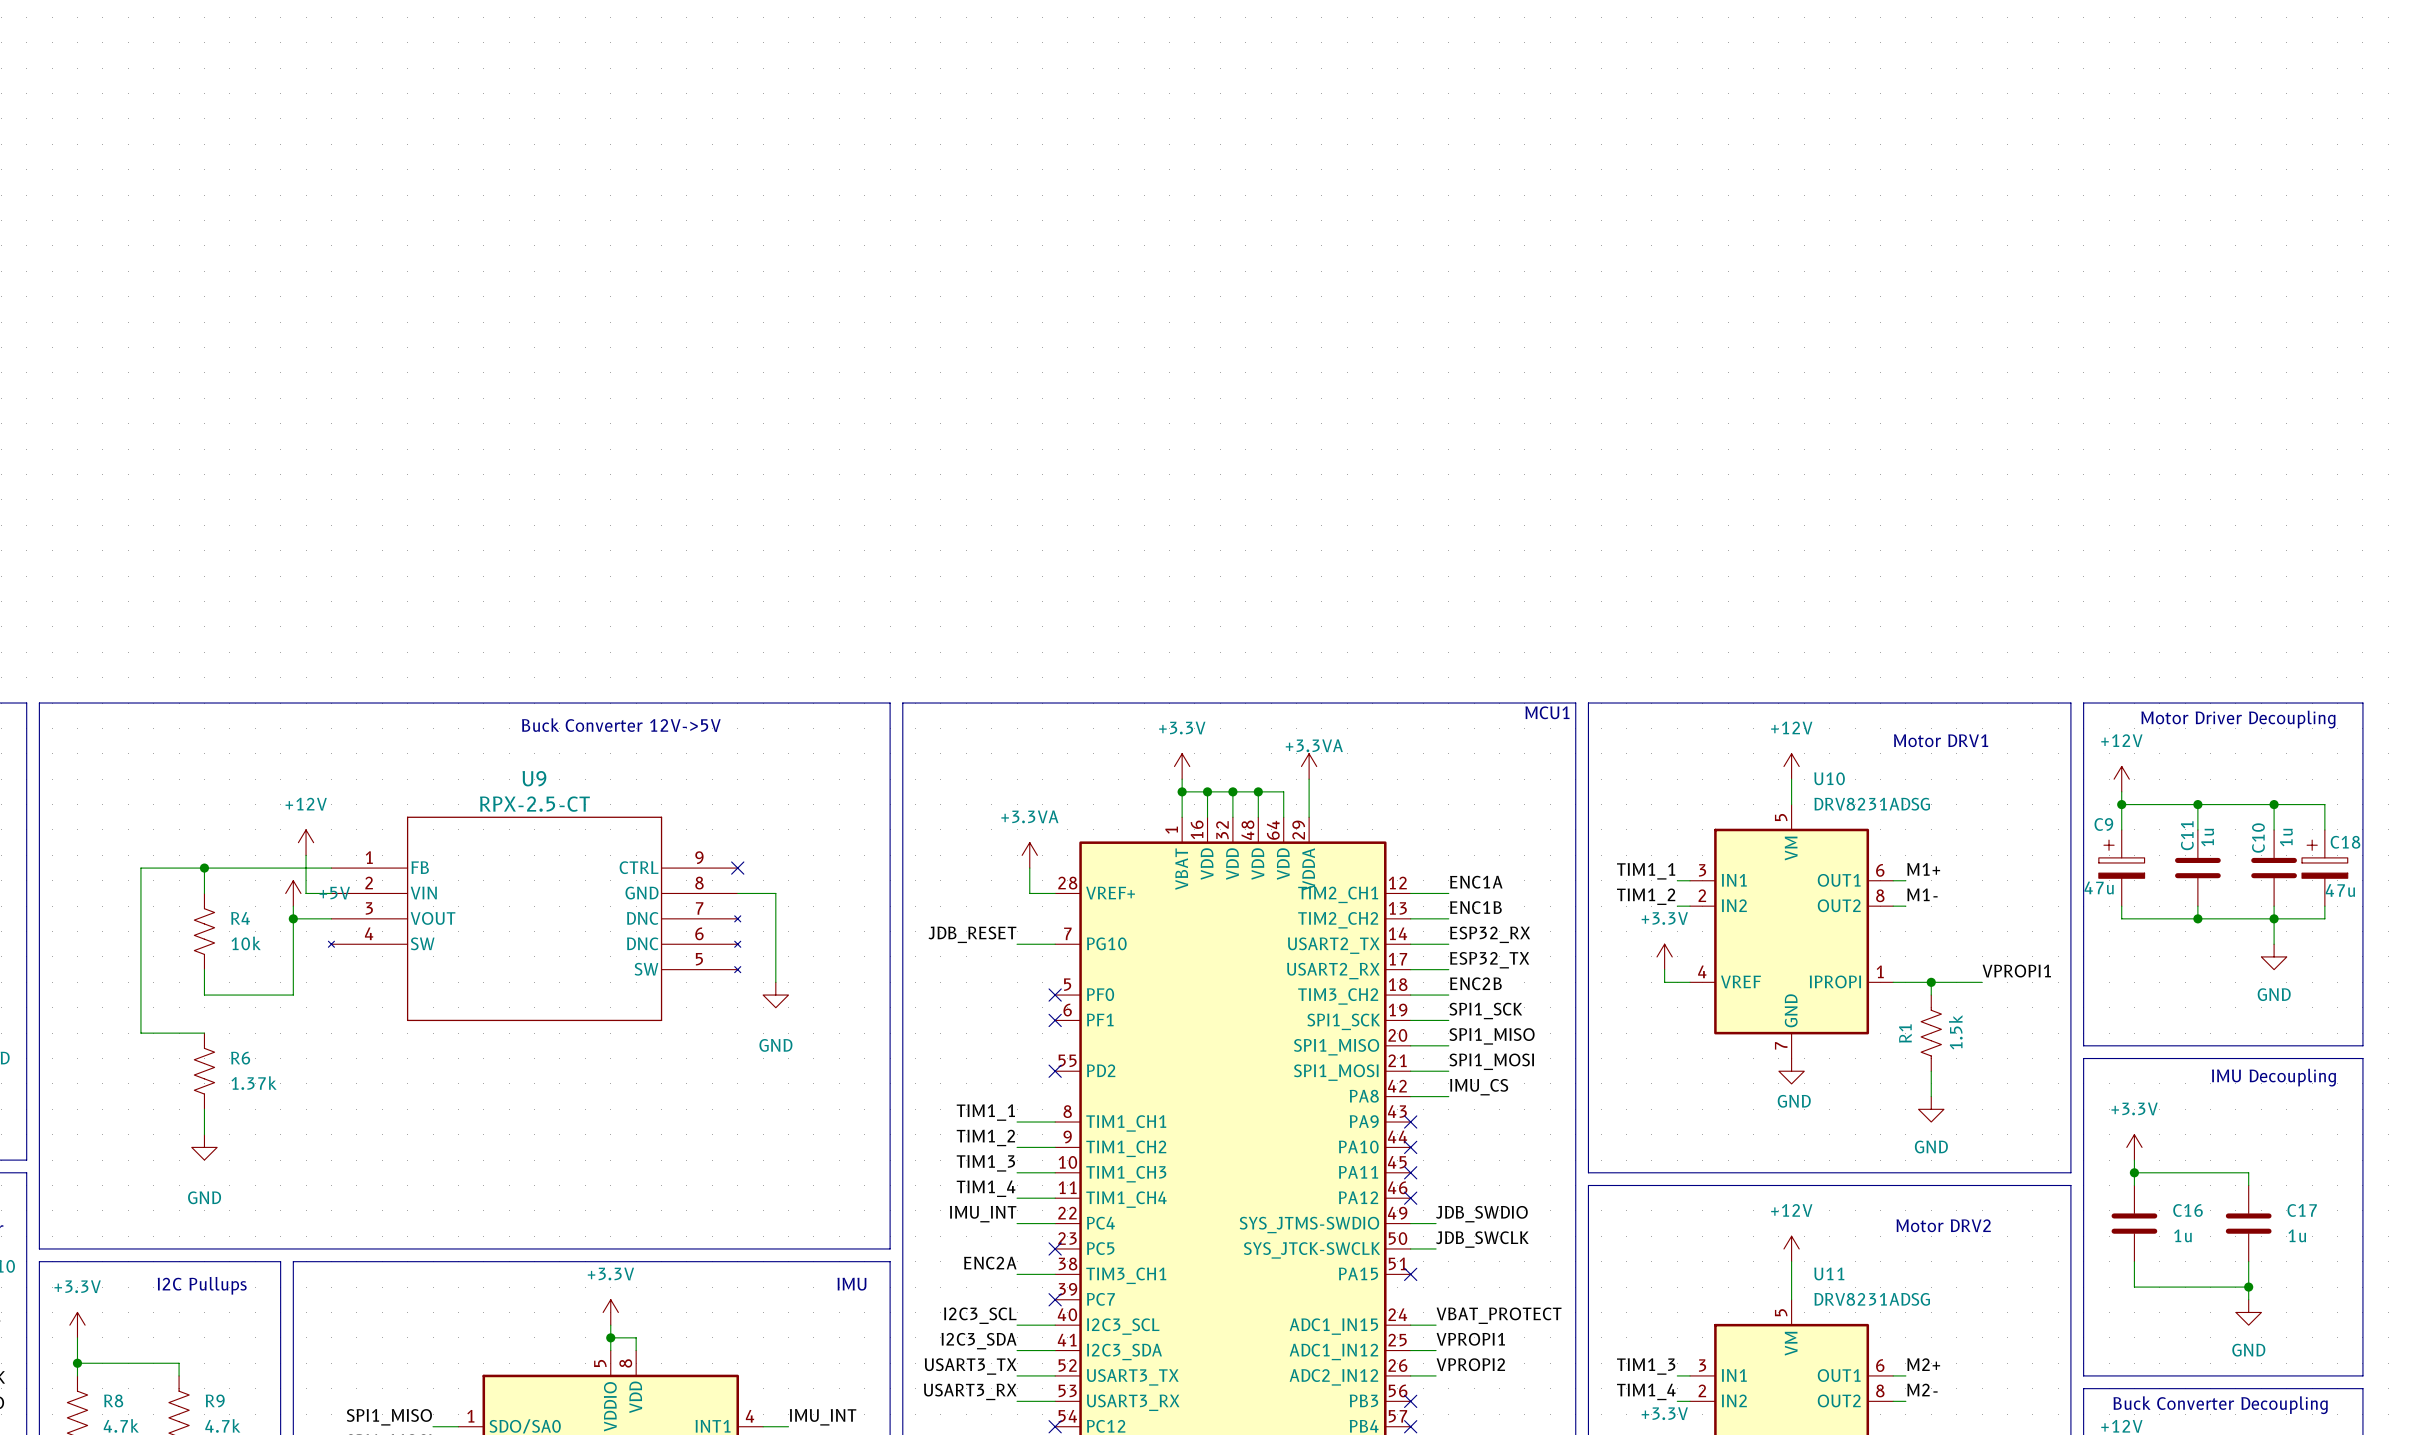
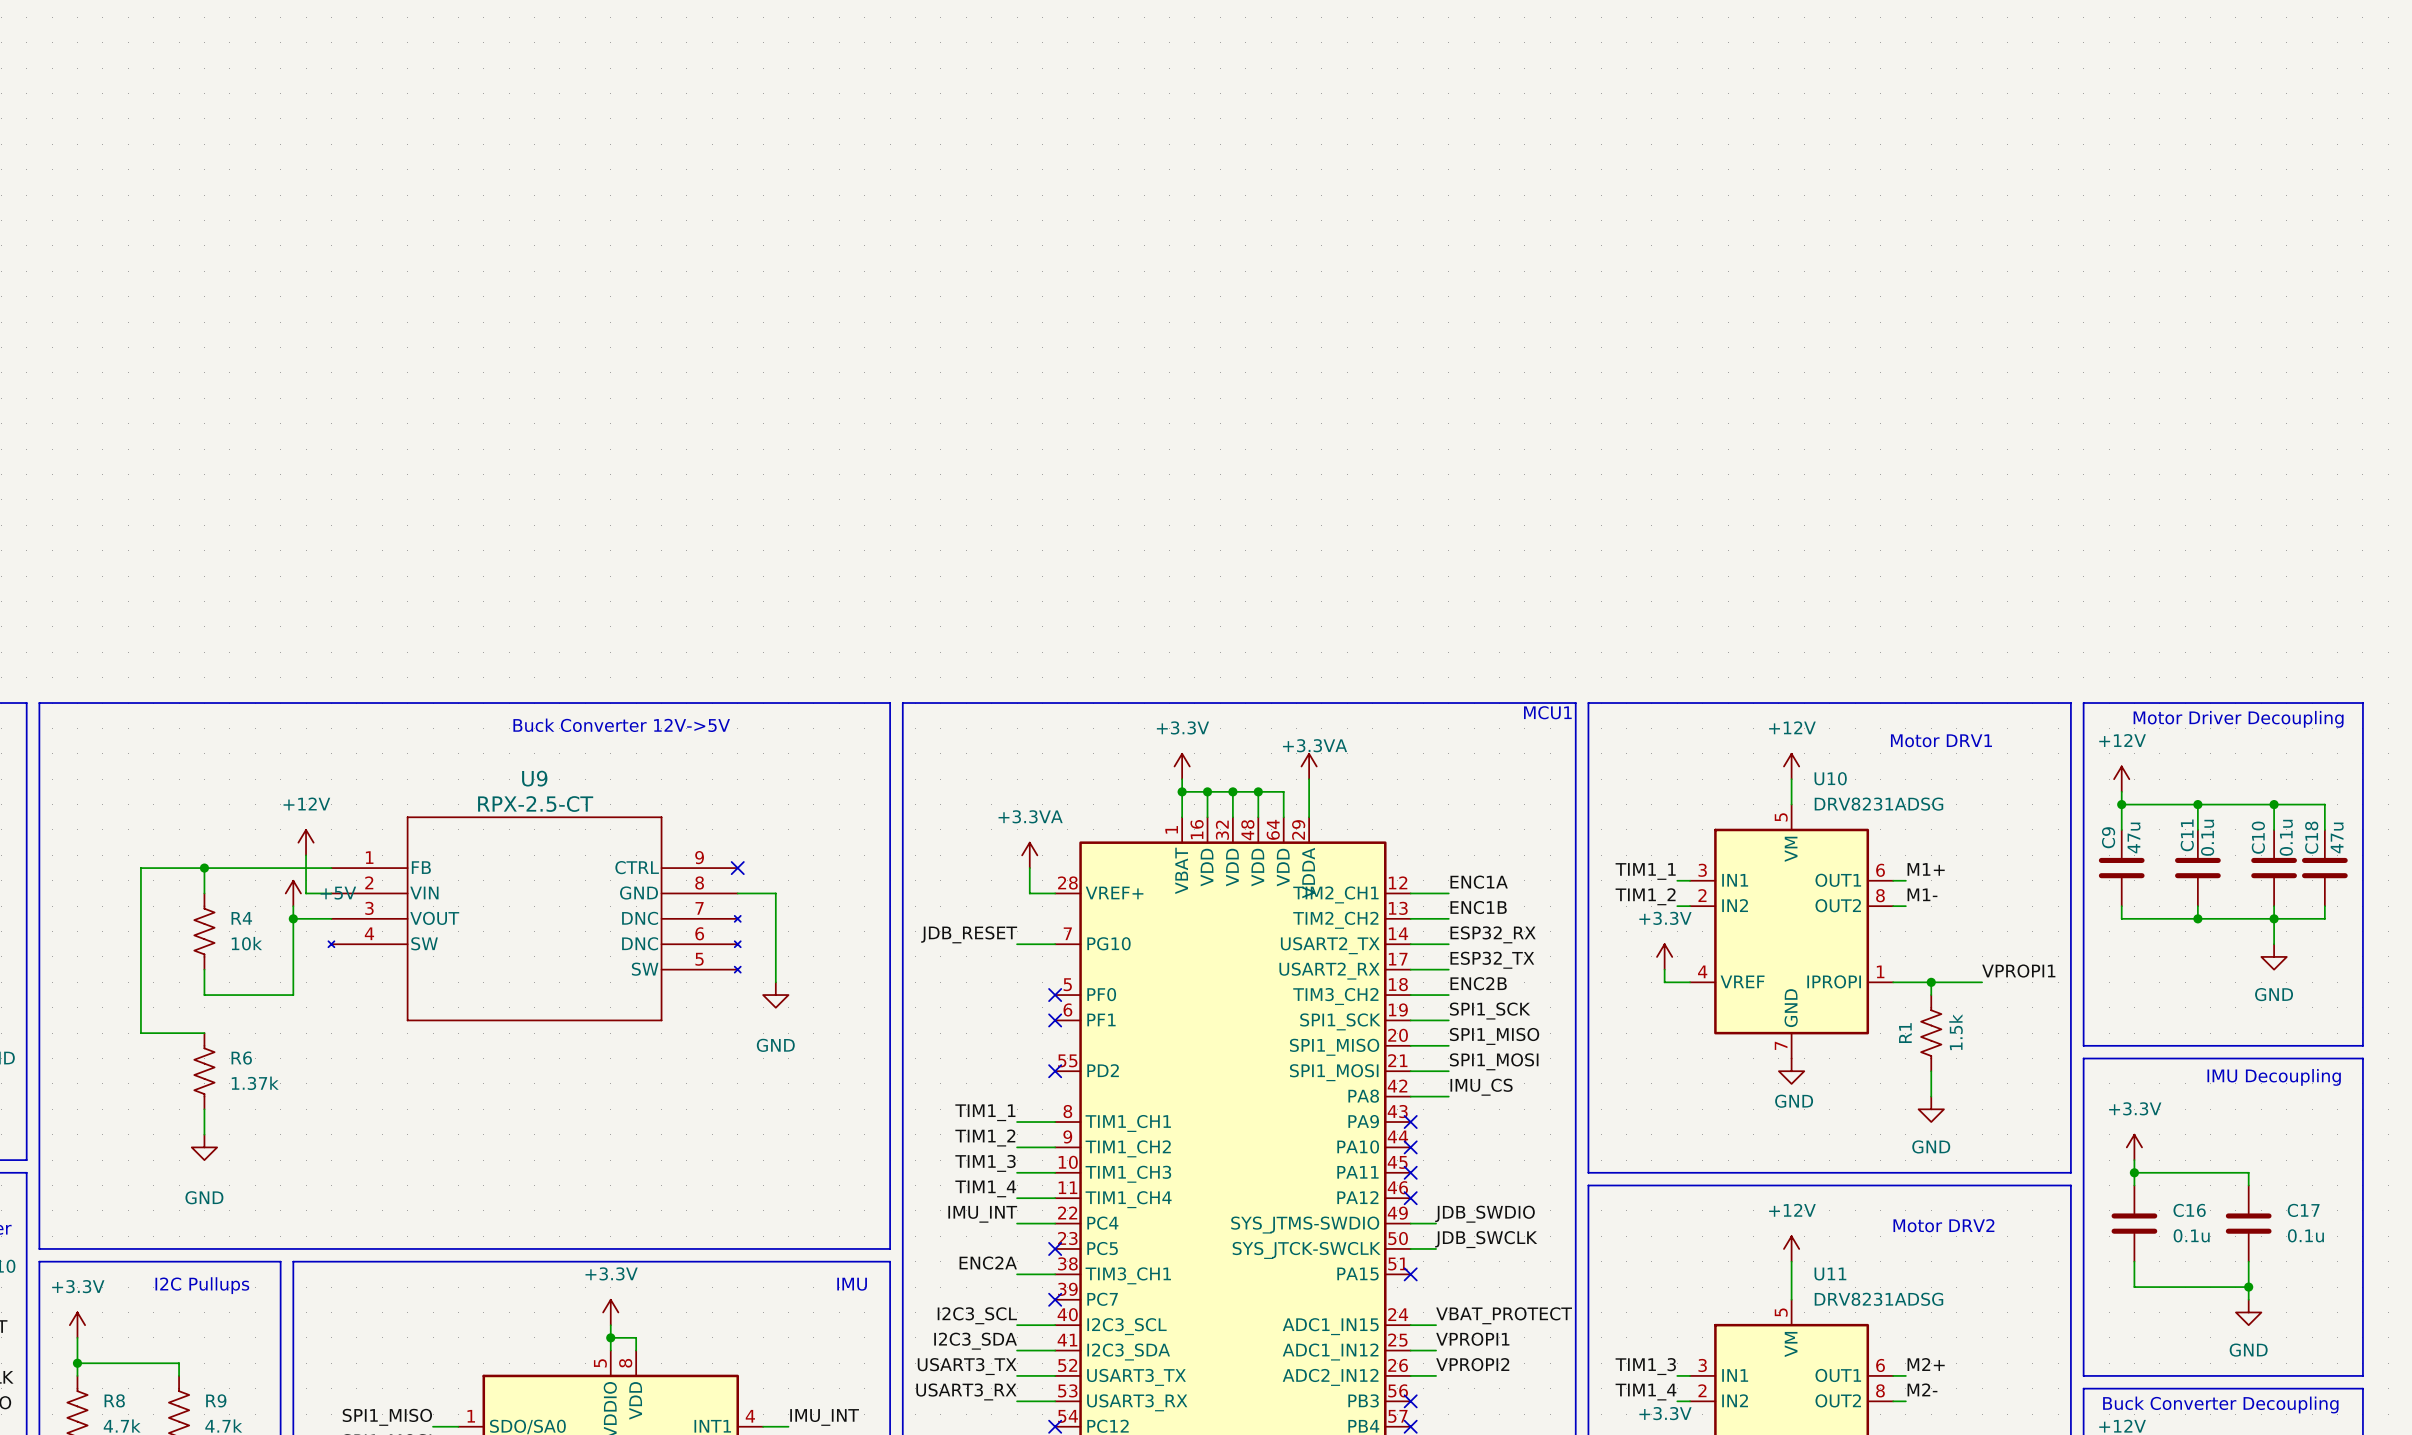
C9 symbol: [2098, 829, 2145, 907] -> [2098, 829, 2145, 907]
C18 symbol: [2302, 829, 2348, 907] -> [2302, 829, 2348, 907]
C11 value: 1u (2207, 837) -> 0.1u (2207, 837)
C10 value: 1u (2286, 837) -> 0.1u (2286, 837)
C18 name position: C18 (2345, 842) -> C18 (2311, 837)
C9 value position: 47u (2099, 887) -> 47u (2134, 837)
C18 value position: 47u (2340, 890) -> 47u (2337, 837)
C16 value: 1u (2182, 1235) -> 0.1u (2191, 1235)
C17 value: 1u (2297, 1235) -> 0.1u (2305, 1235)

